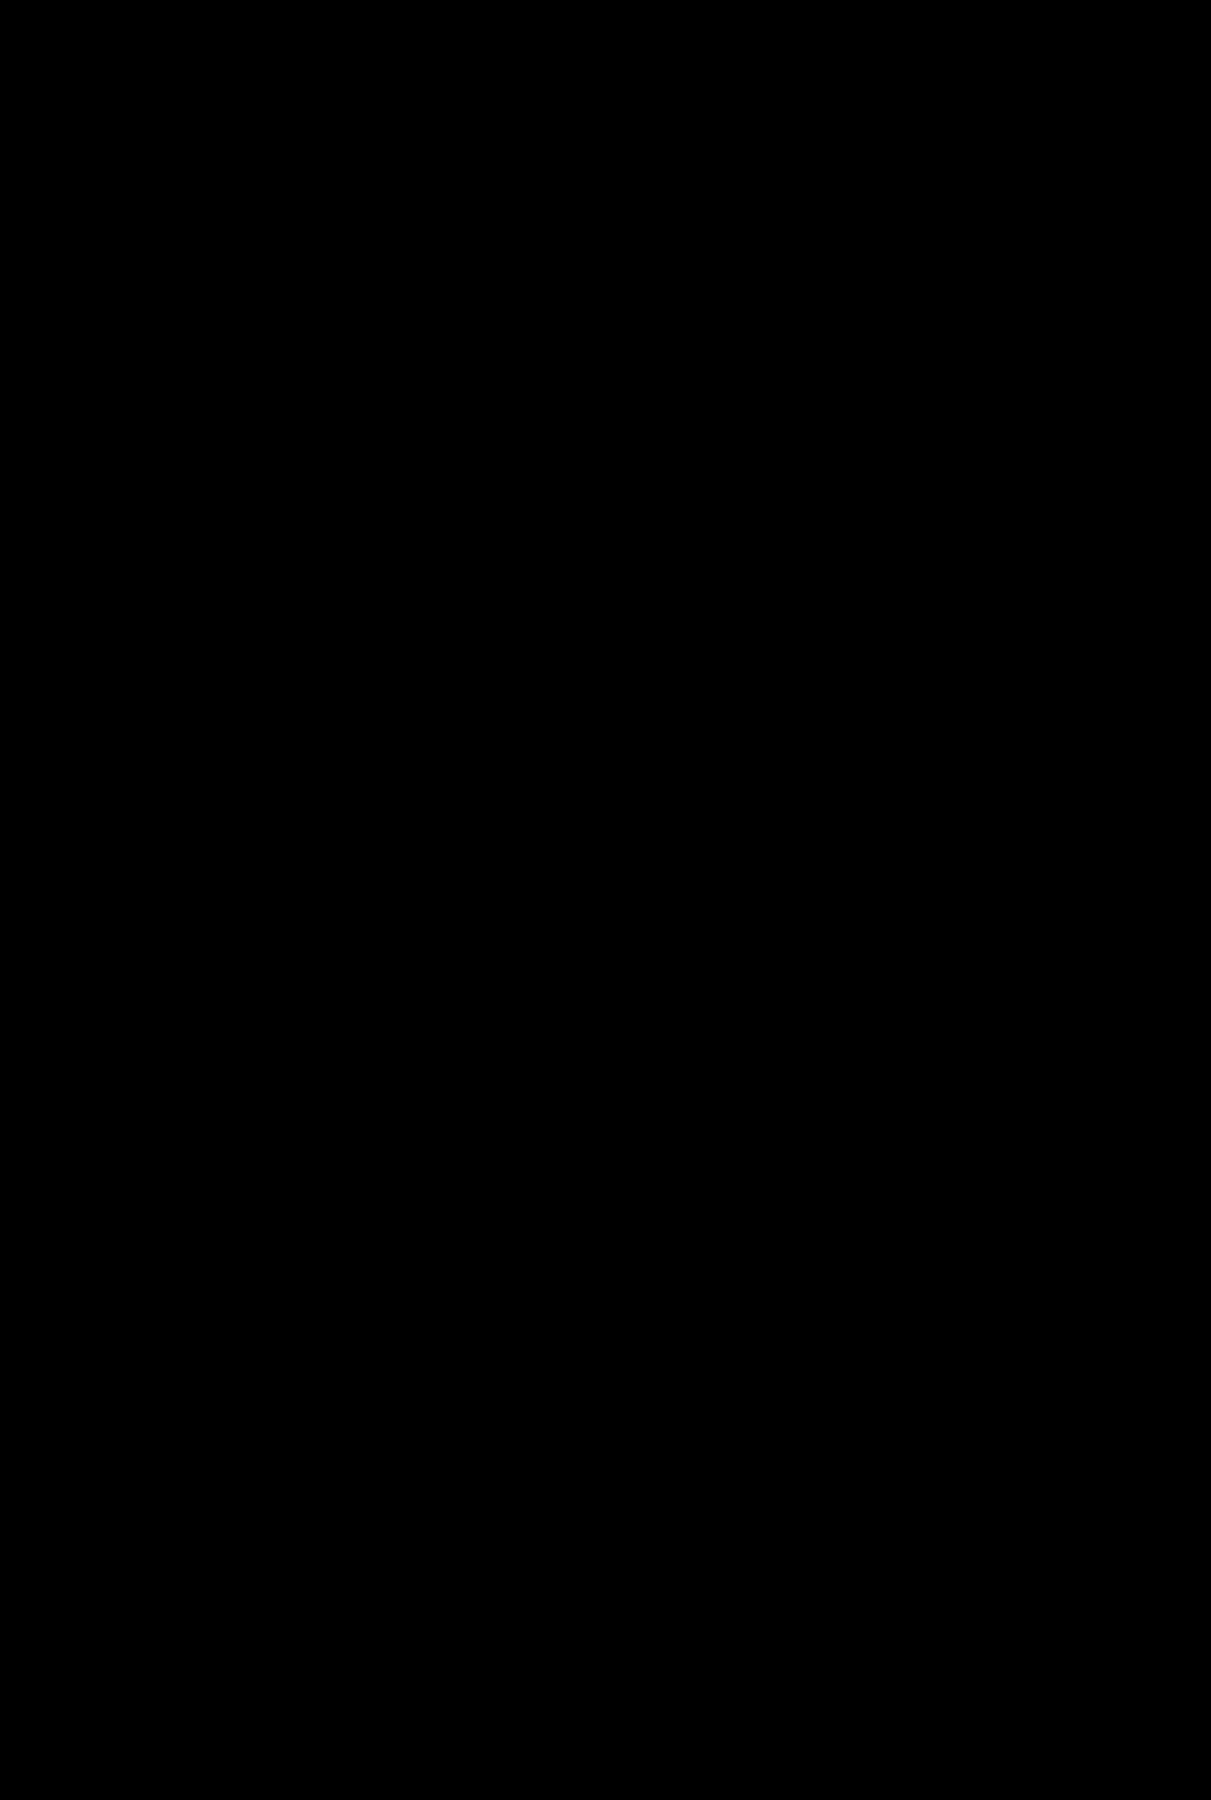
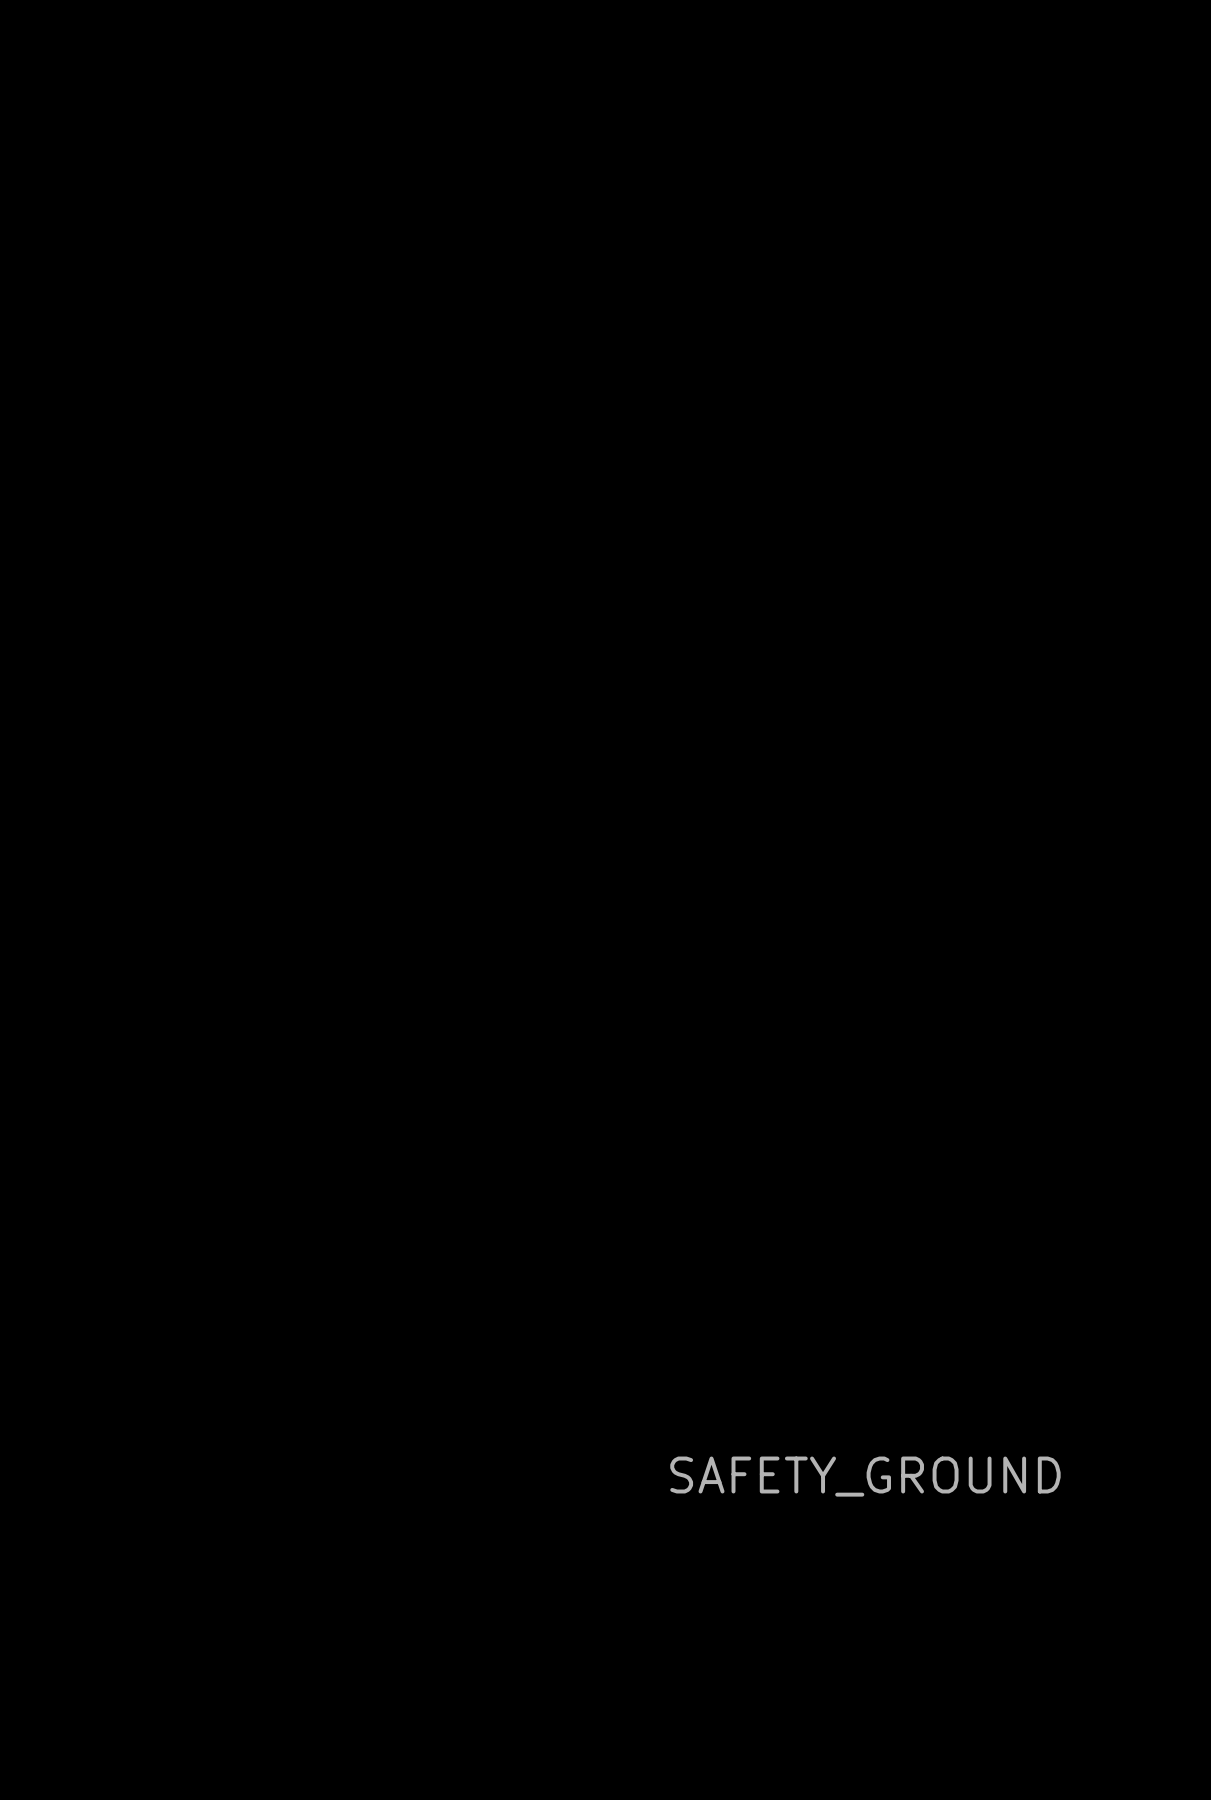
label: none -> SAFETY_GROUND (865, 1476)

